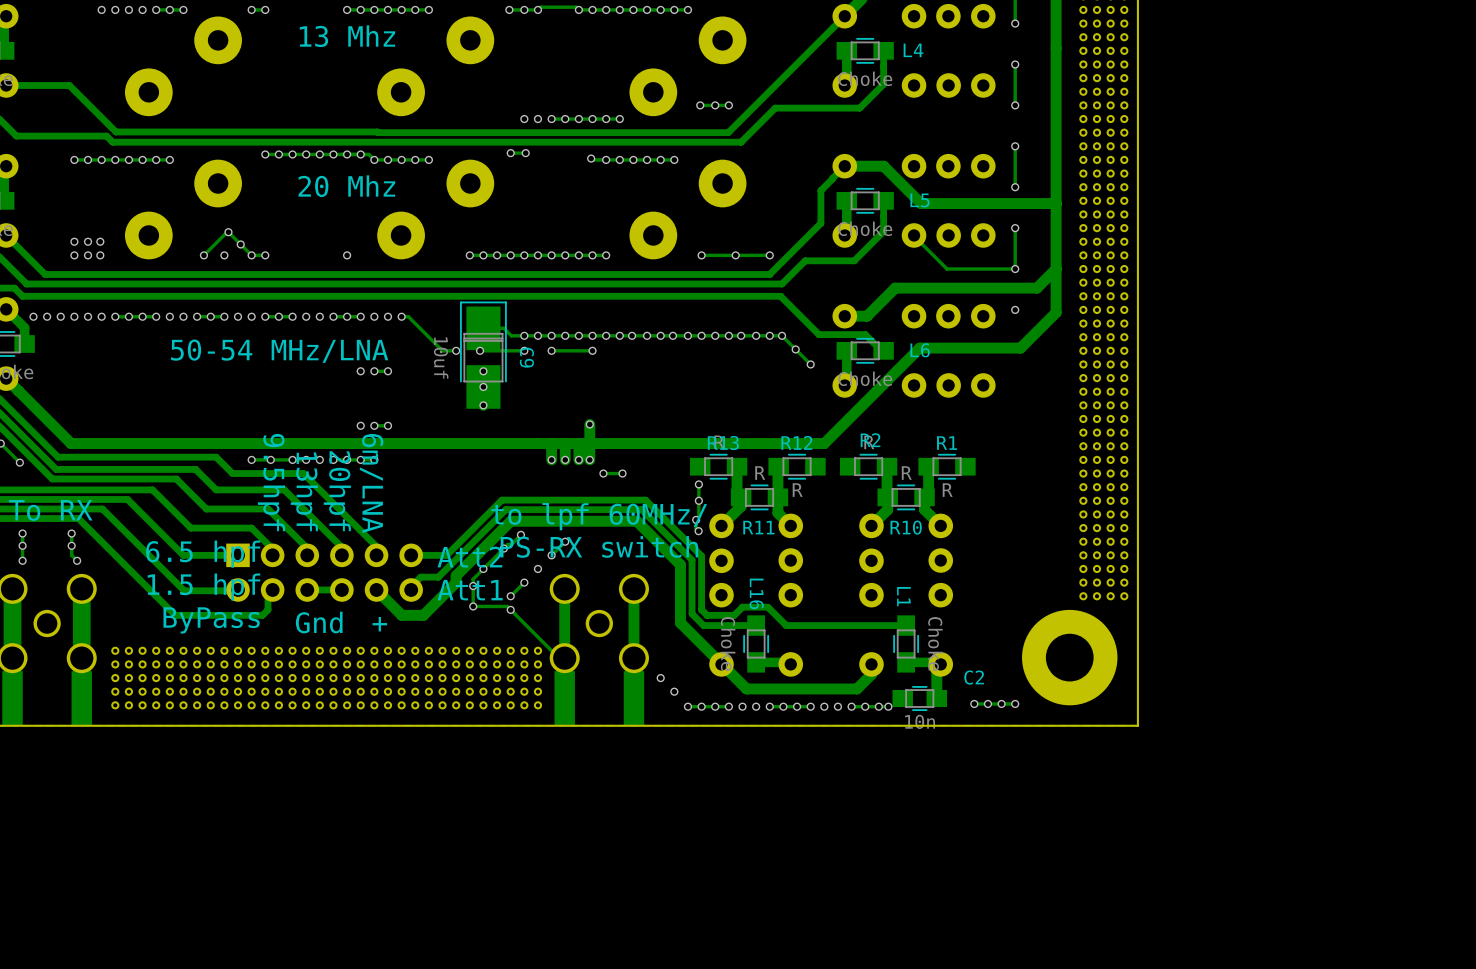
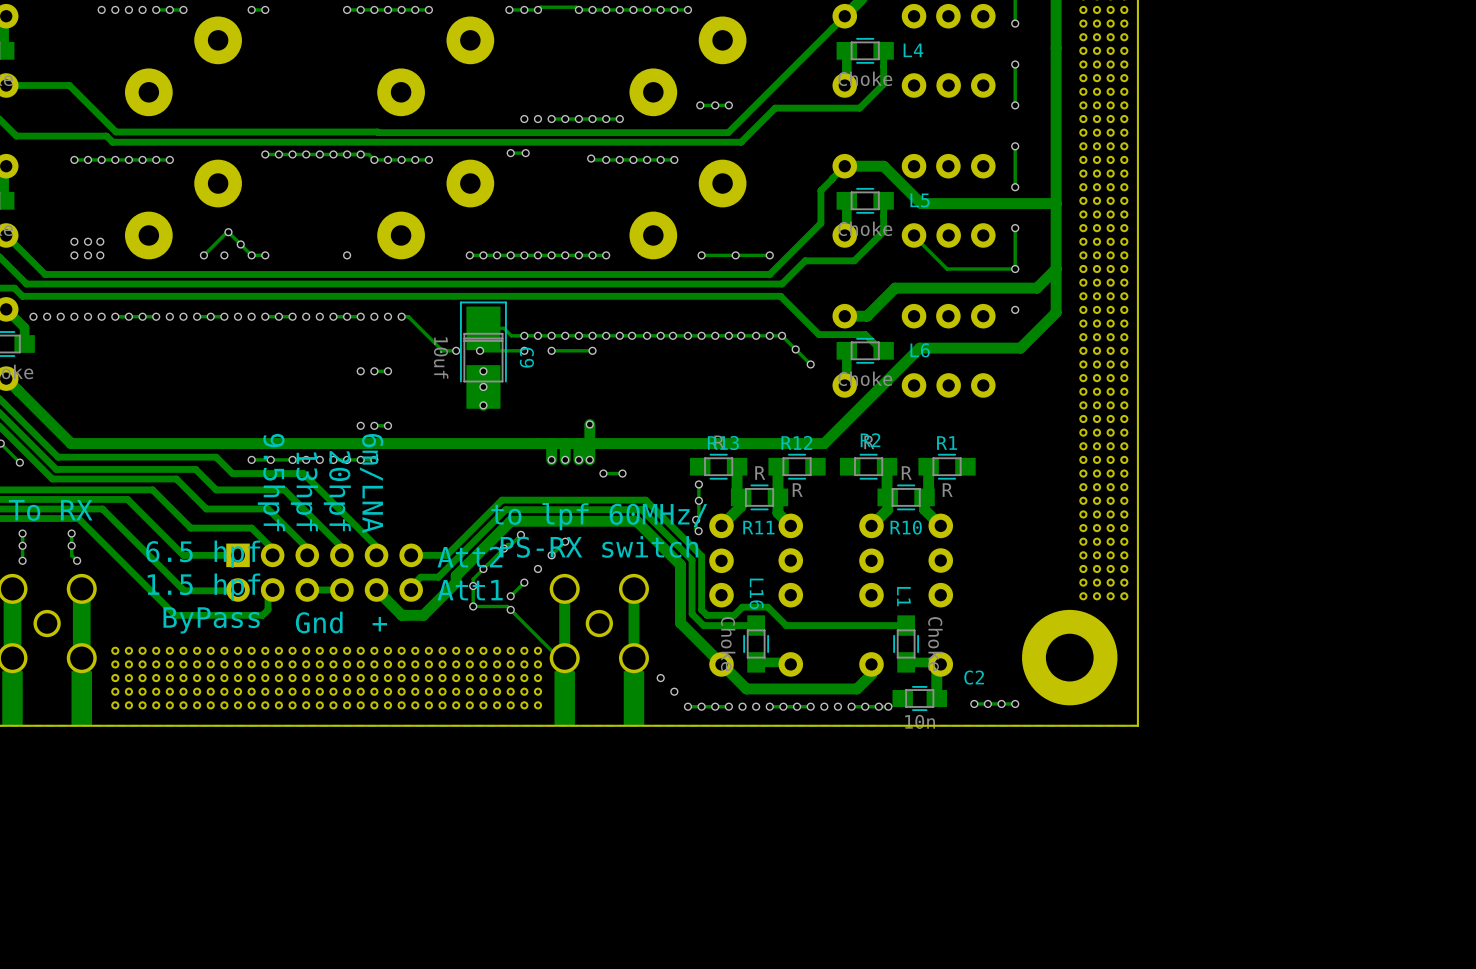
text: 13 Mhz (347, 36) -> none
text: 20 Mhz (346, 186) -> none
text: 50-54 MHz/LNA (279, 351) -> none

